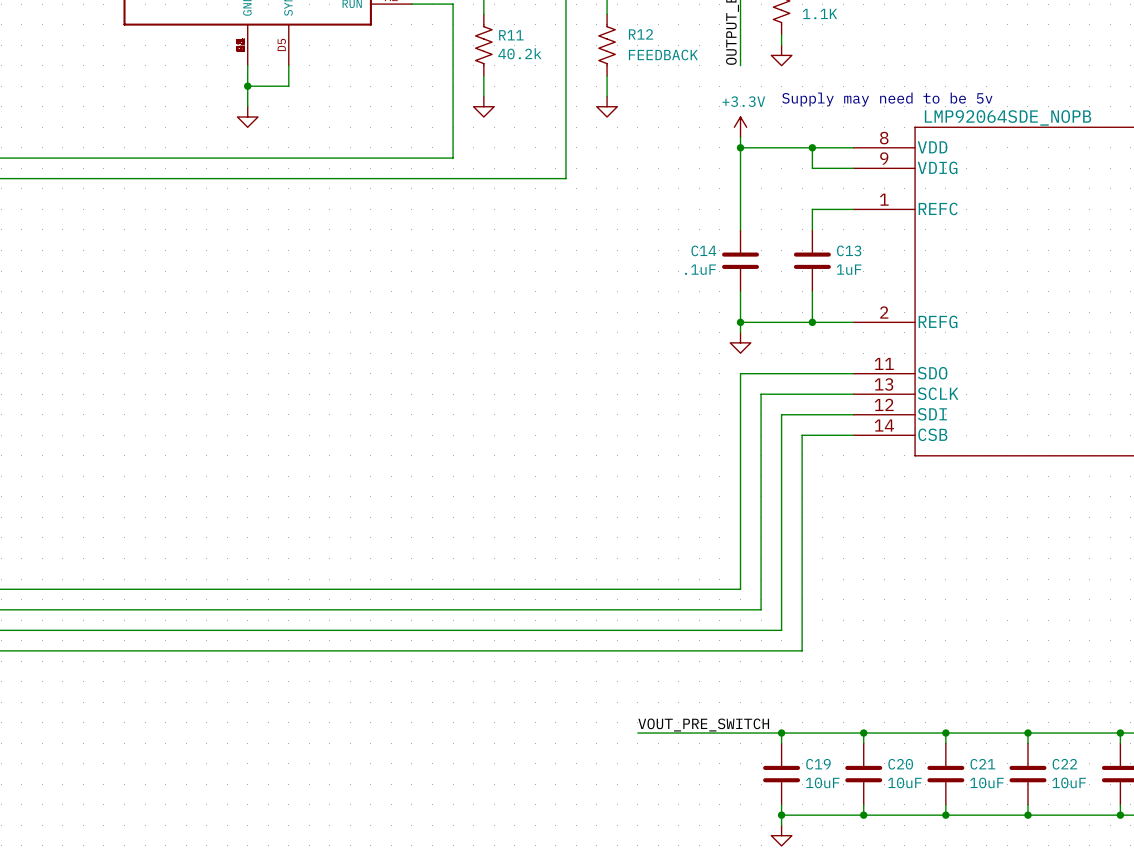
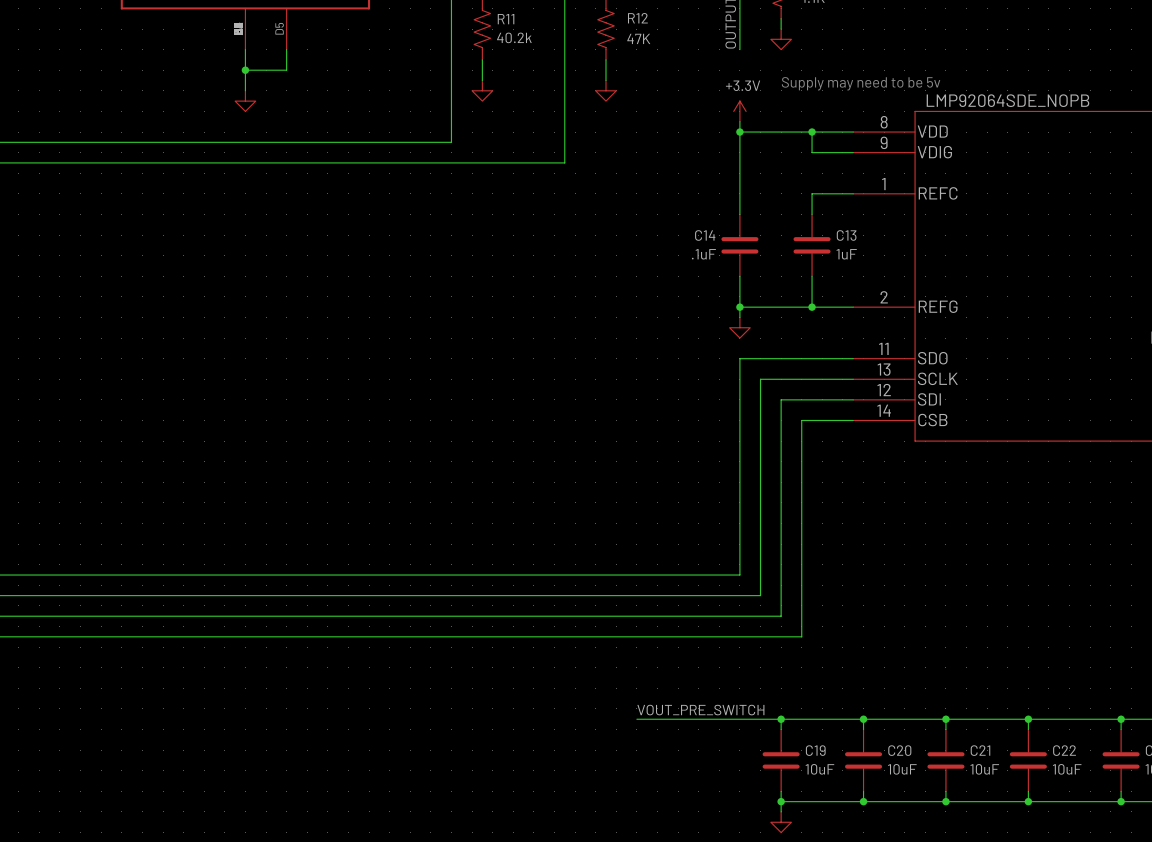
R12 value: FEEDBACK (663, 55) -> 47K (638, 38)

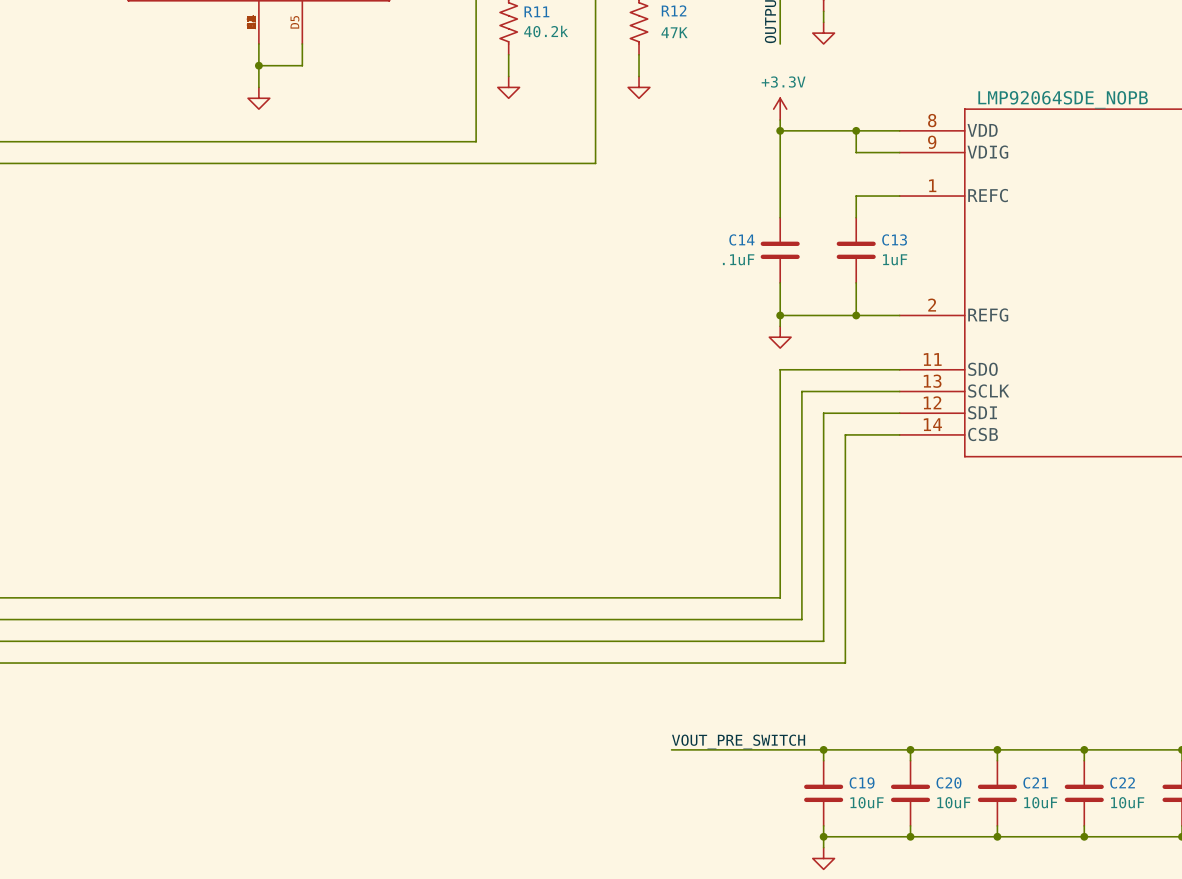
text: Supply may need to be 5v (861, 83) -> none

